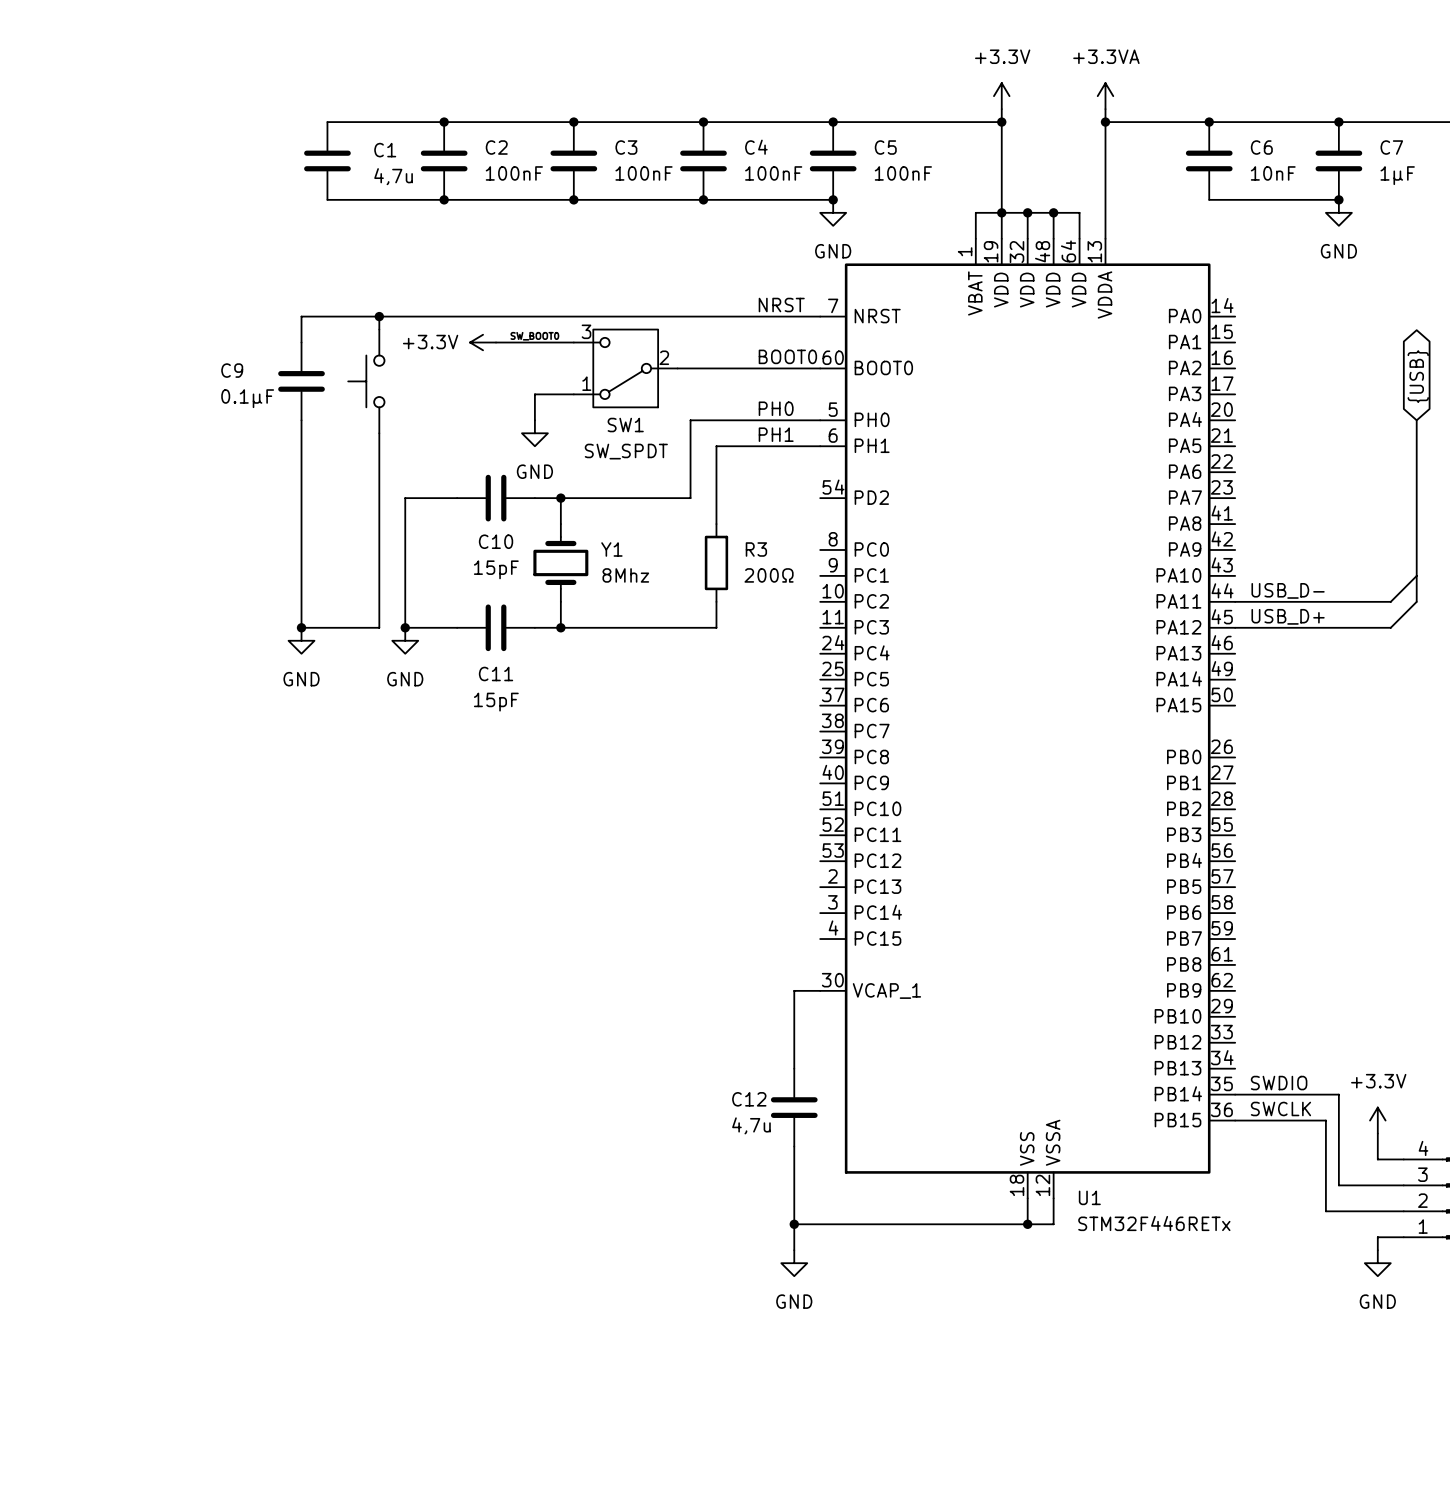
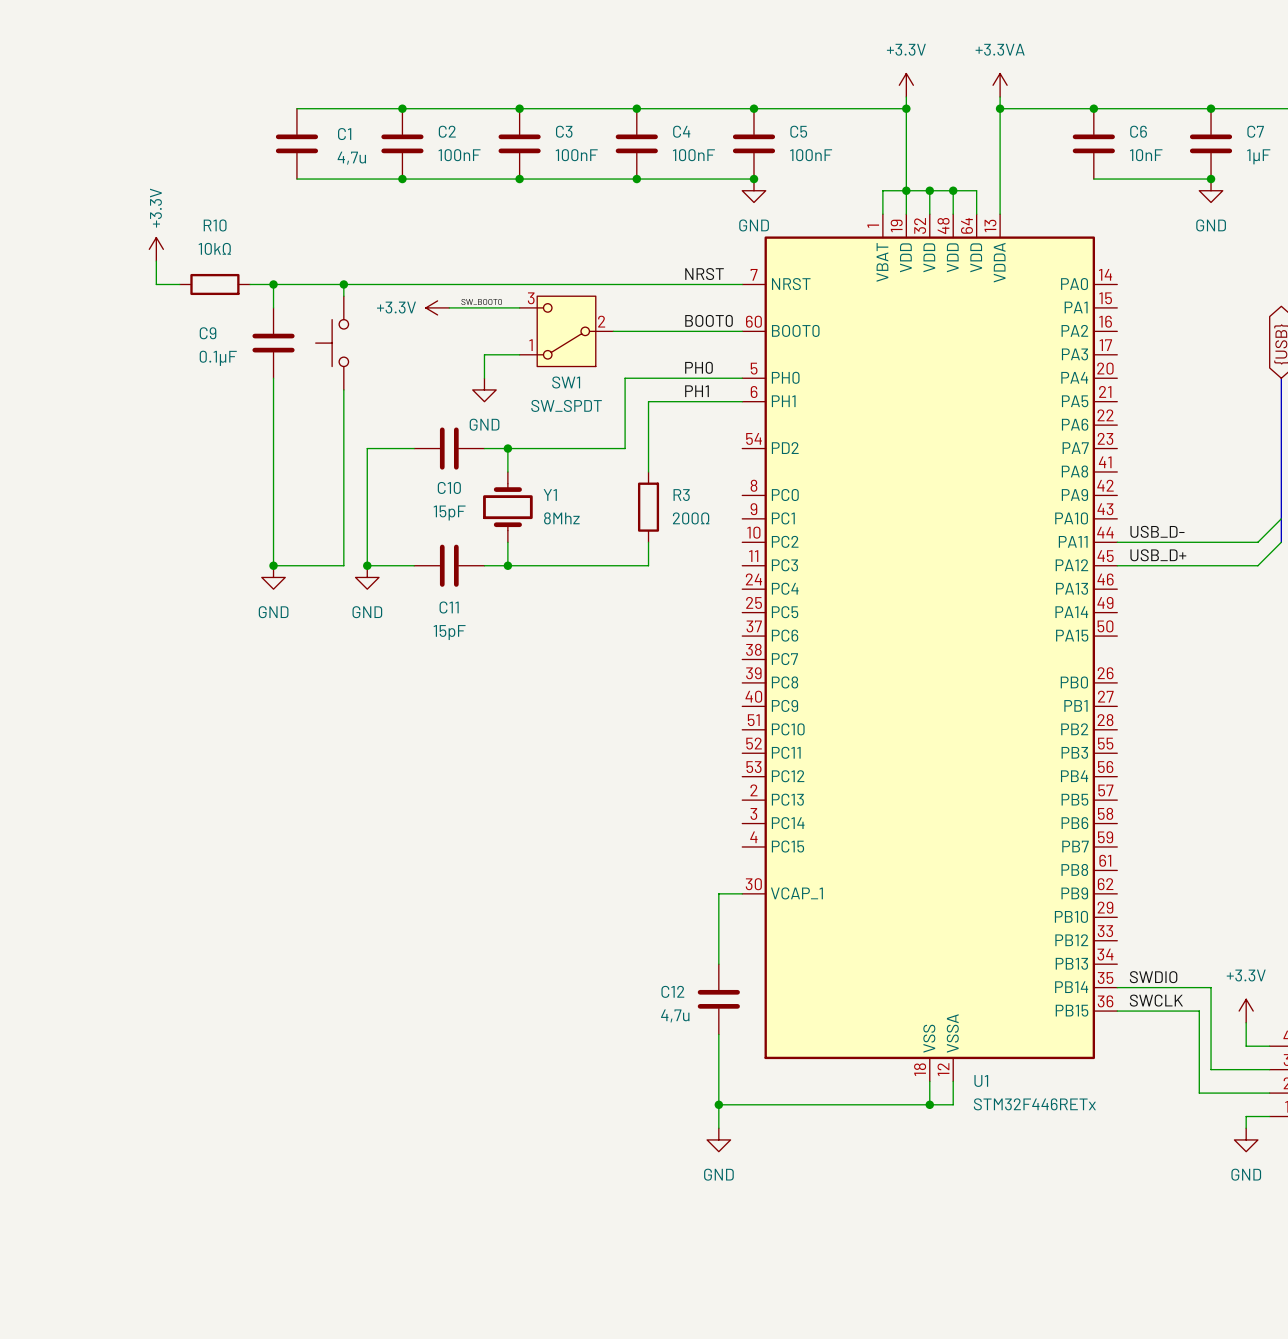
power symbol: none -> +3.3V (156, 249)
wire: none -> (156, 261) (156, 284) (179, 284)
R10: none -> 10kΩ (214, 284)
wire: none -> (250, 284) (273, 284)
junction: none -> (273, 284)

